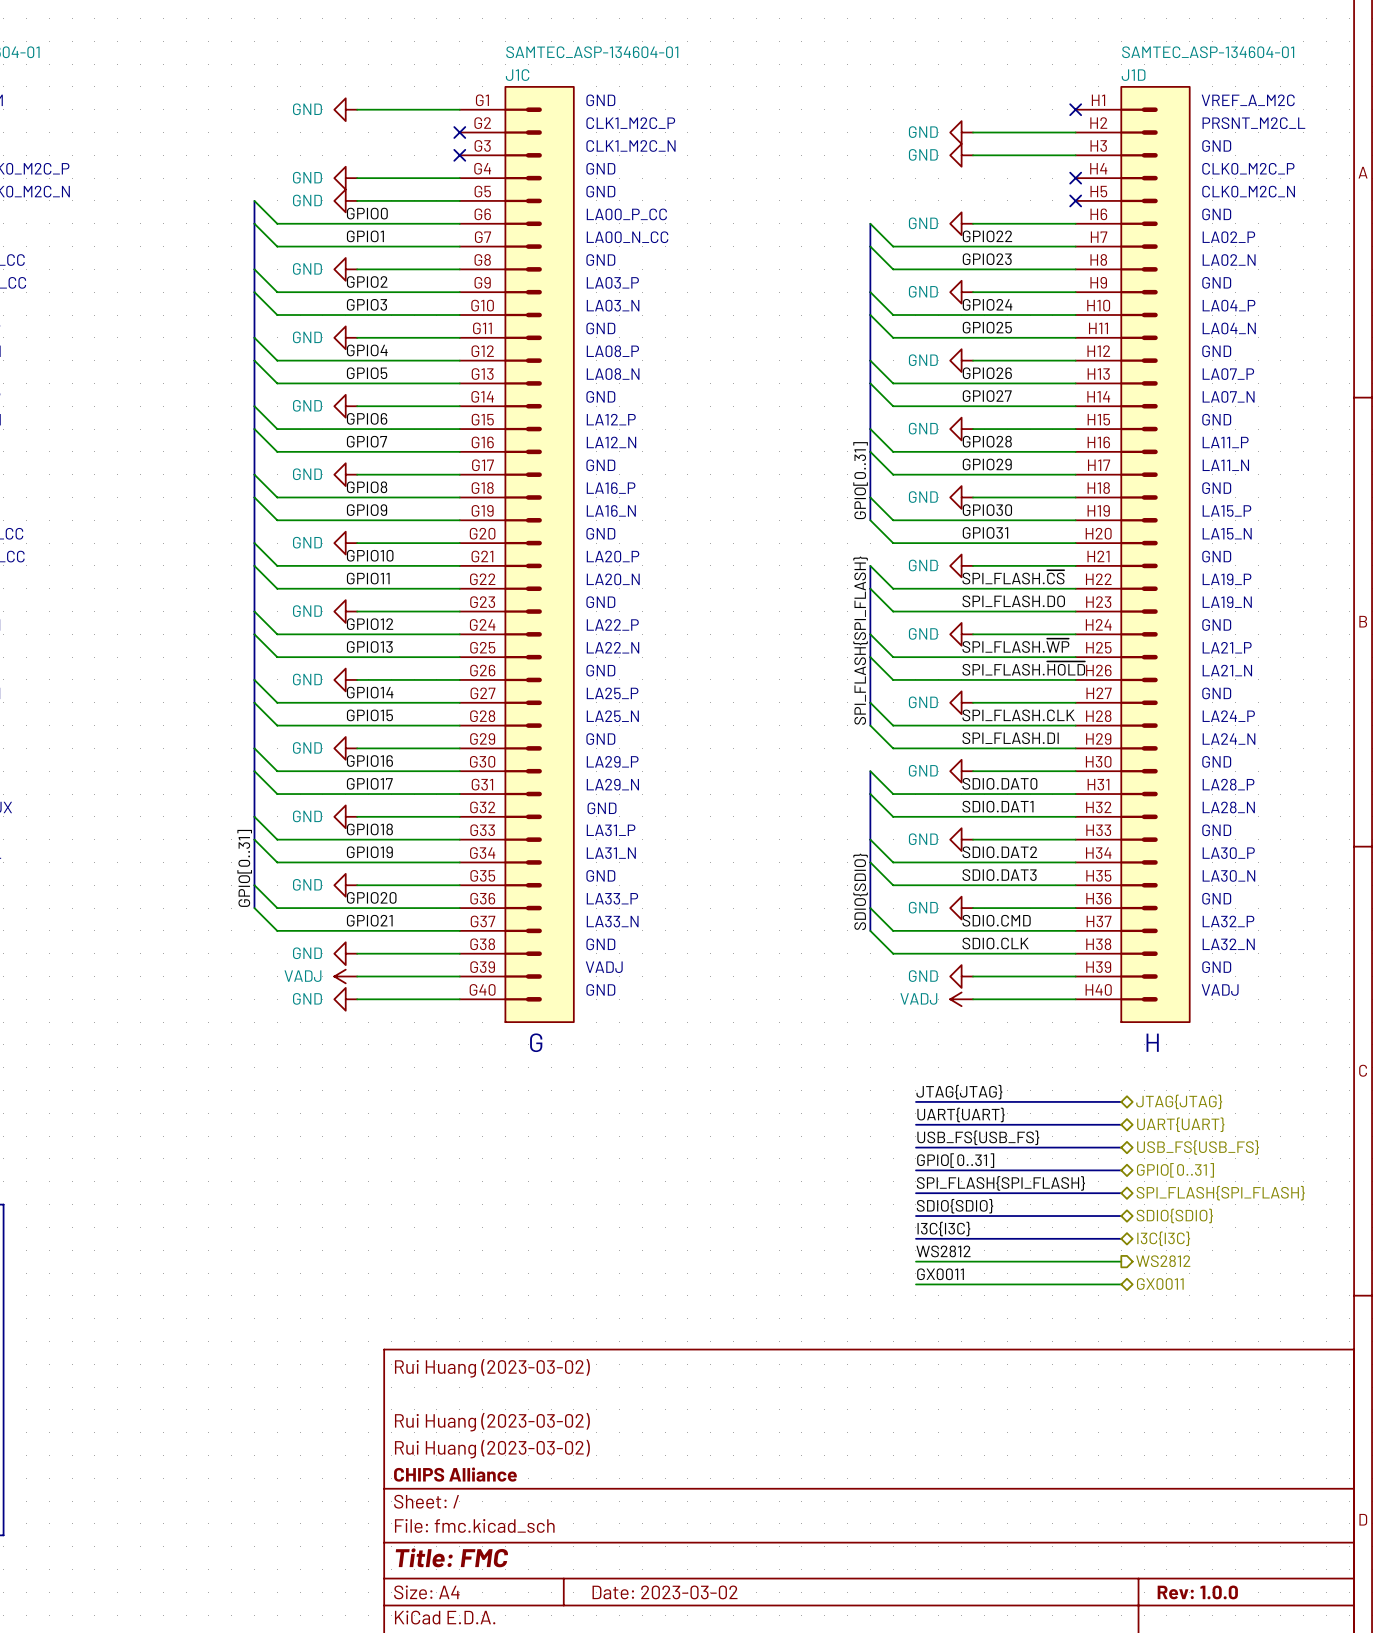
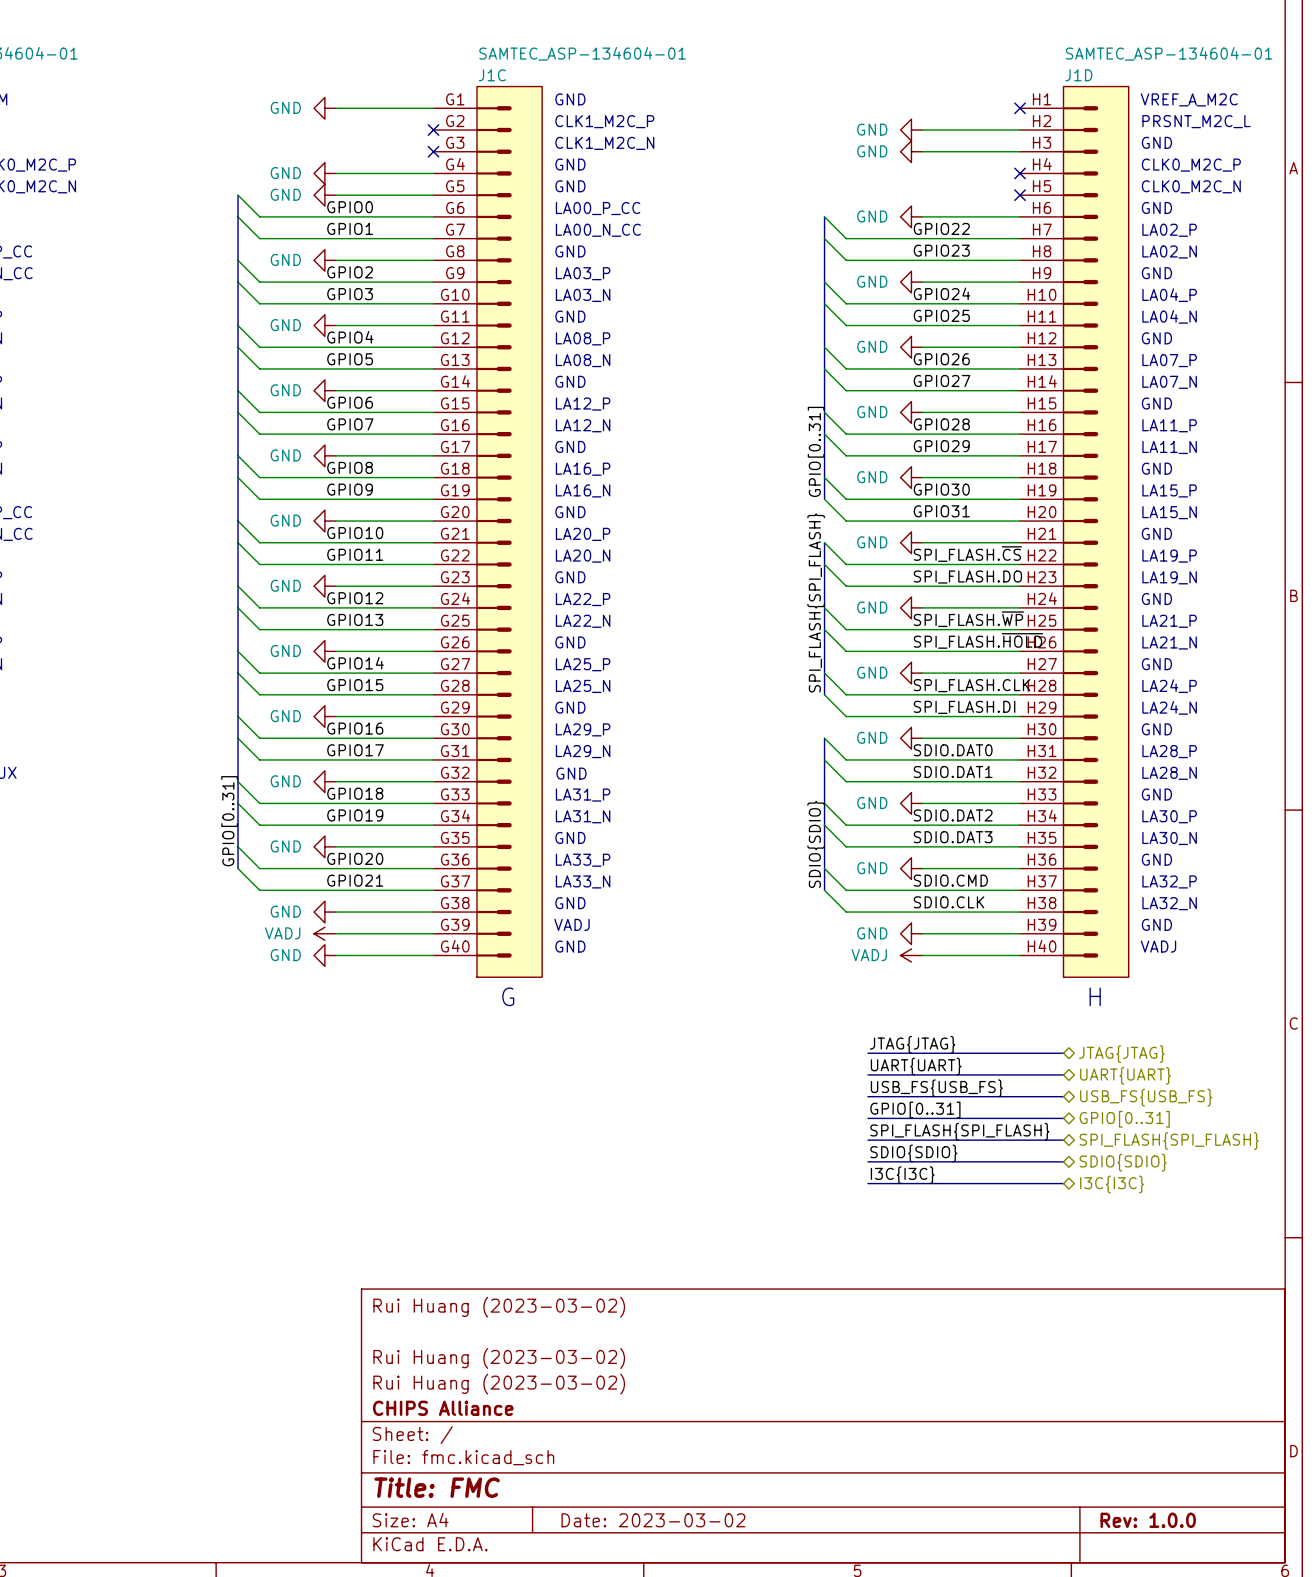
label: WS2812 (943, 1251) -> none
wire: (915, 1261) (1121, 1261) -> none
hierarchical label: WS2812 (1163, 1261) -> none
label: GX0011 (940, 1274) -> none
wire: (915, 1284) (1121, 1284) -> none
hierarchical label: GX0011 (1160, 1284) -> none

